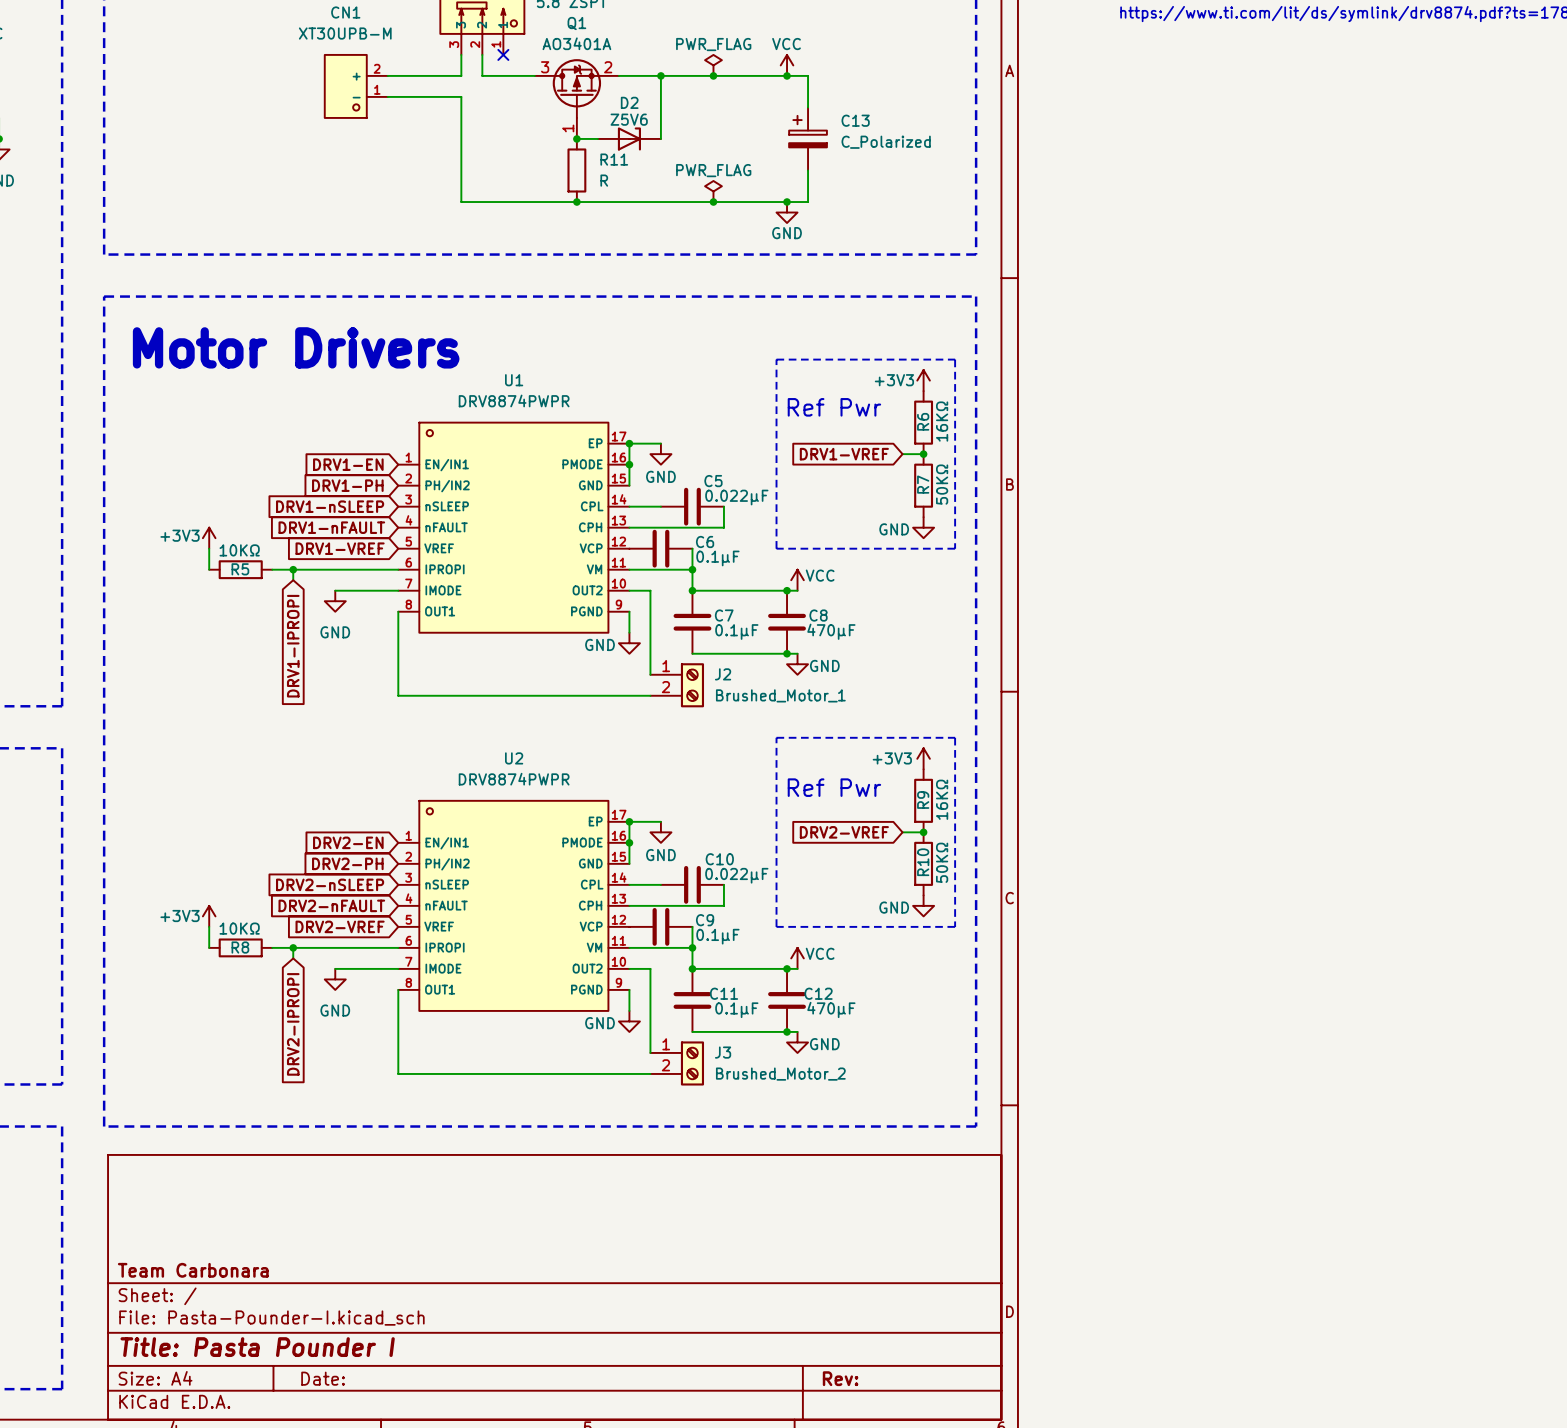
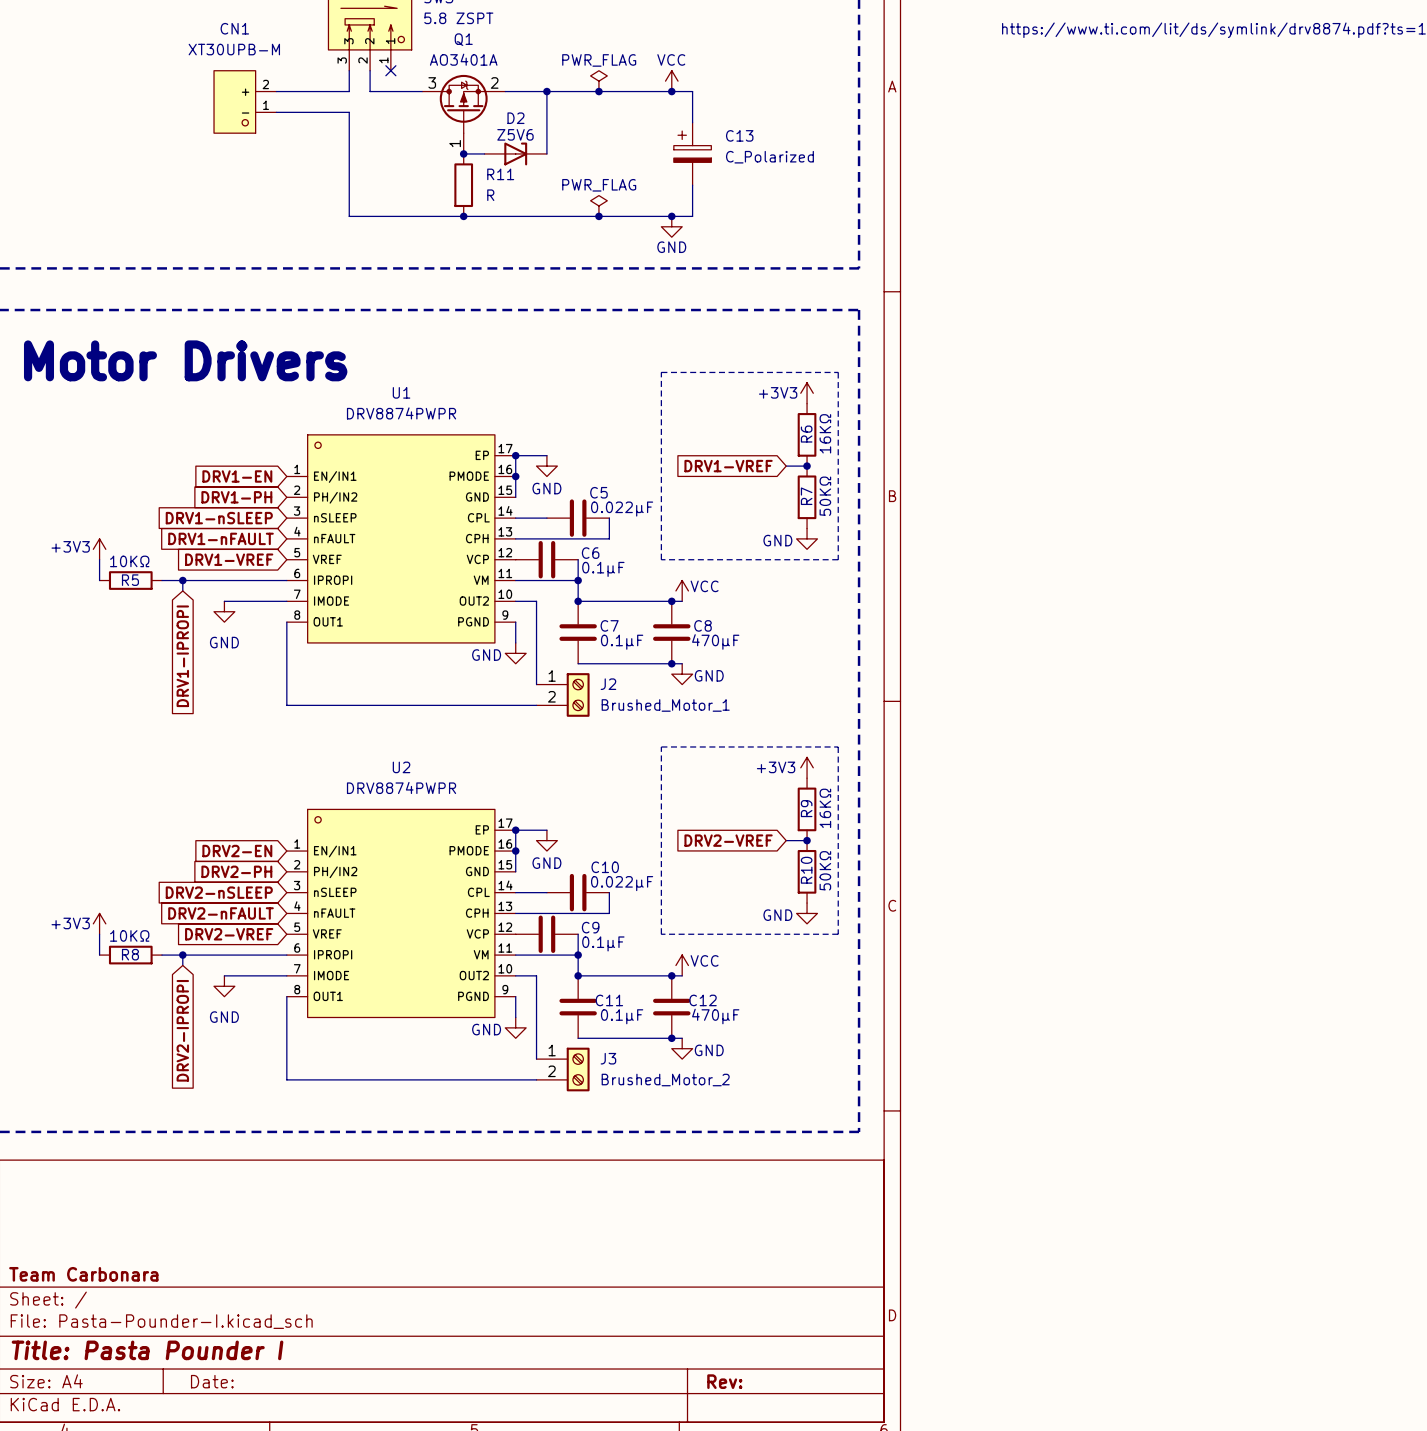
text: Ref Pwr (834, 407) -> none
text: Ref Pwr (834, 787) -> none

